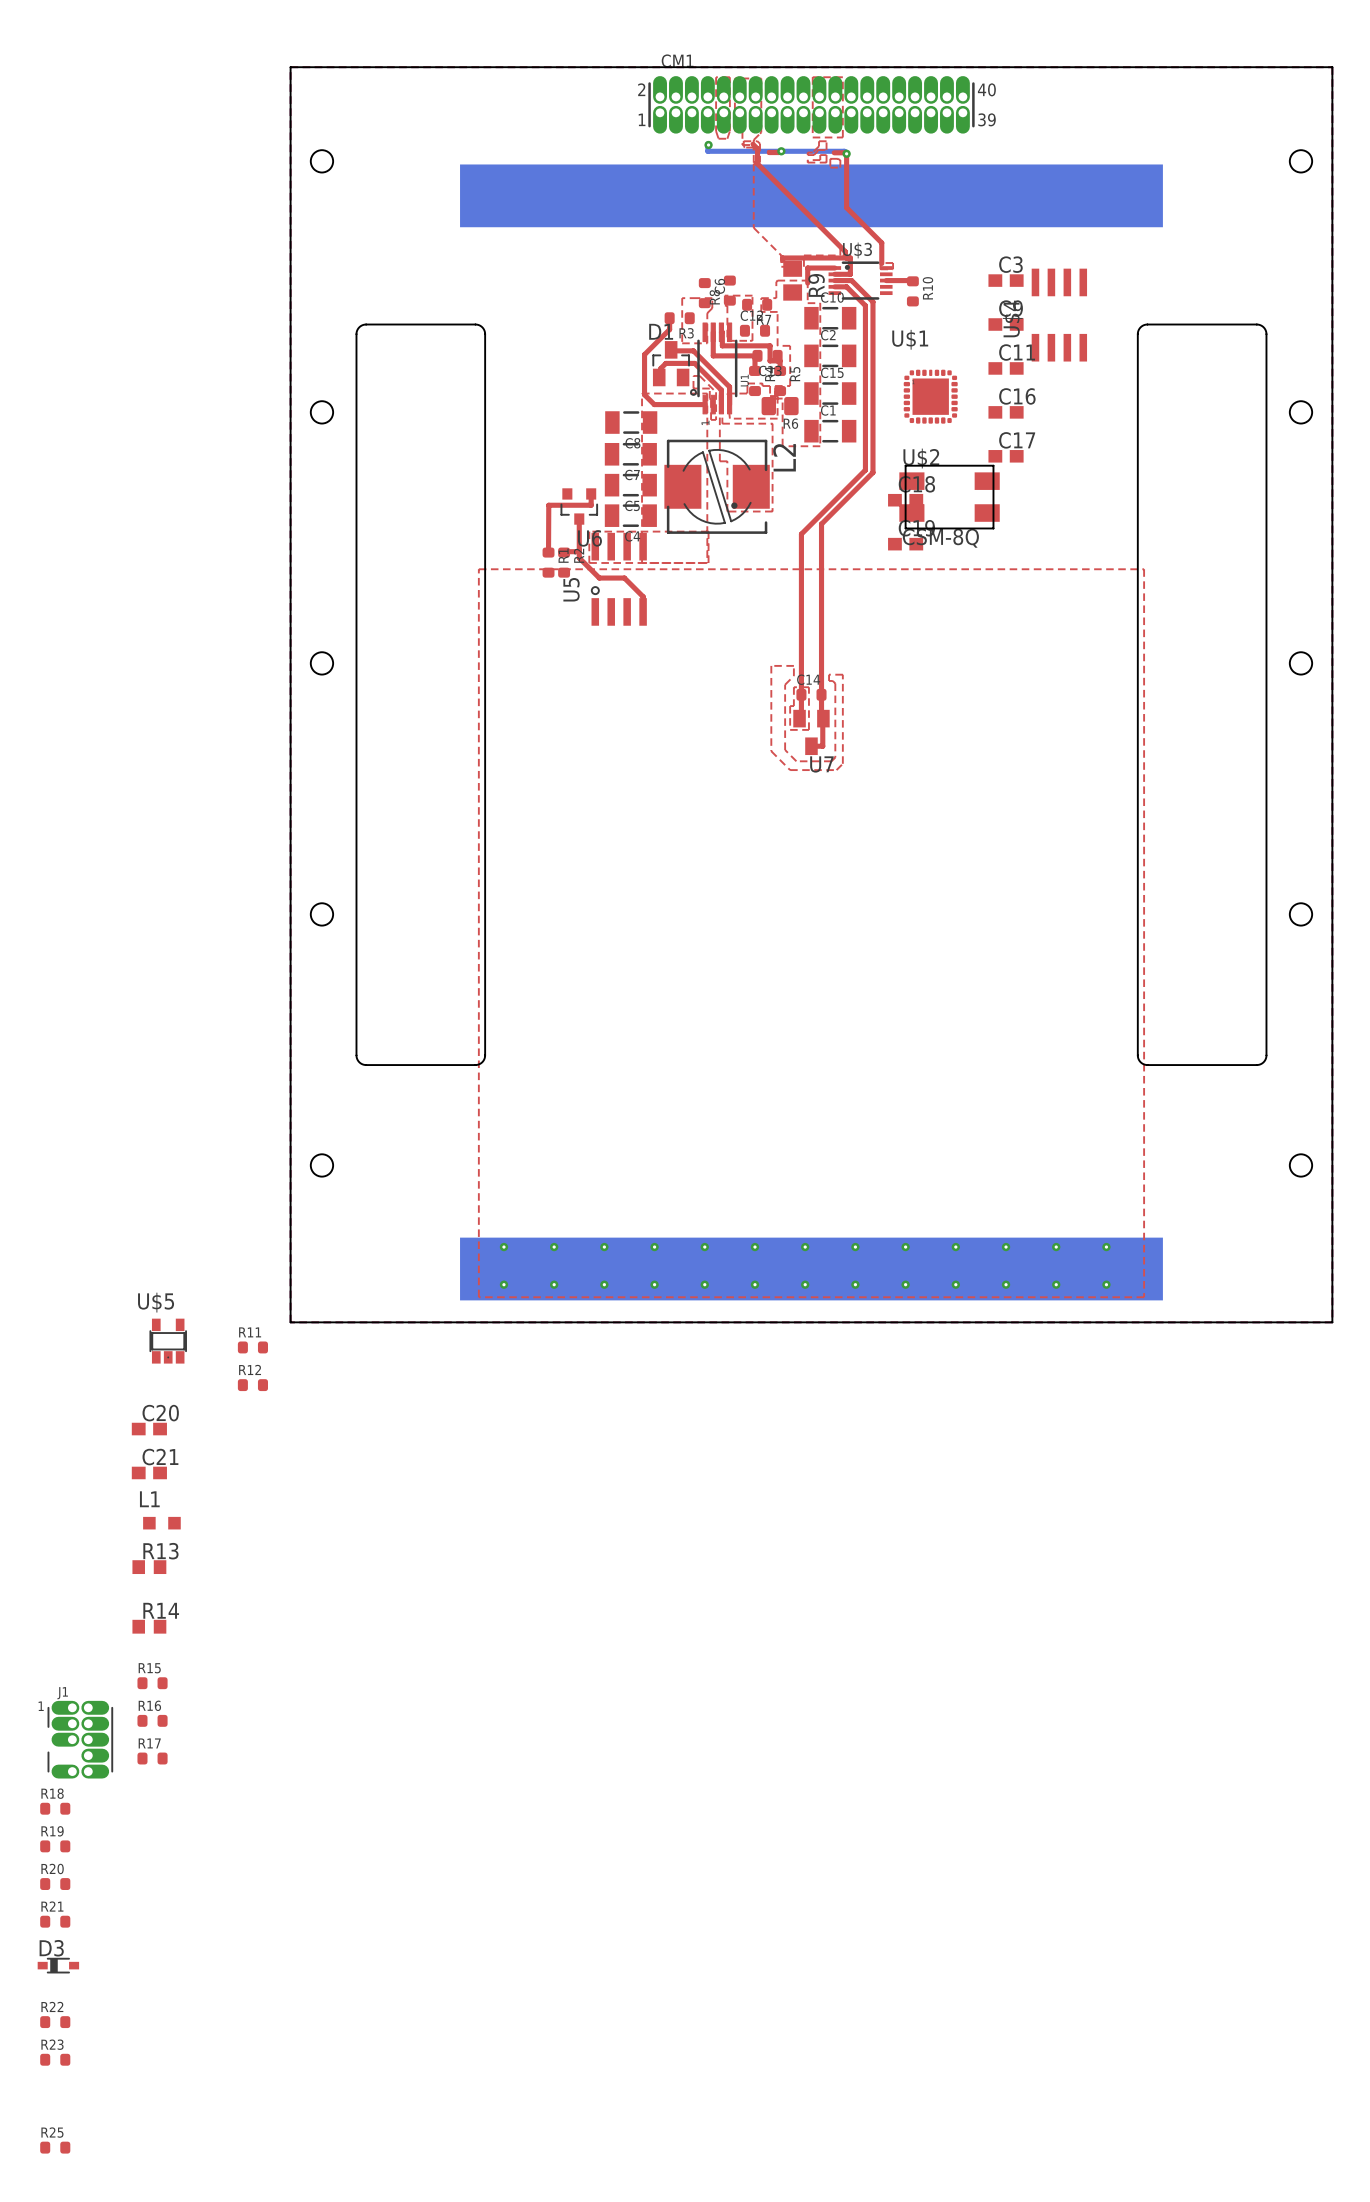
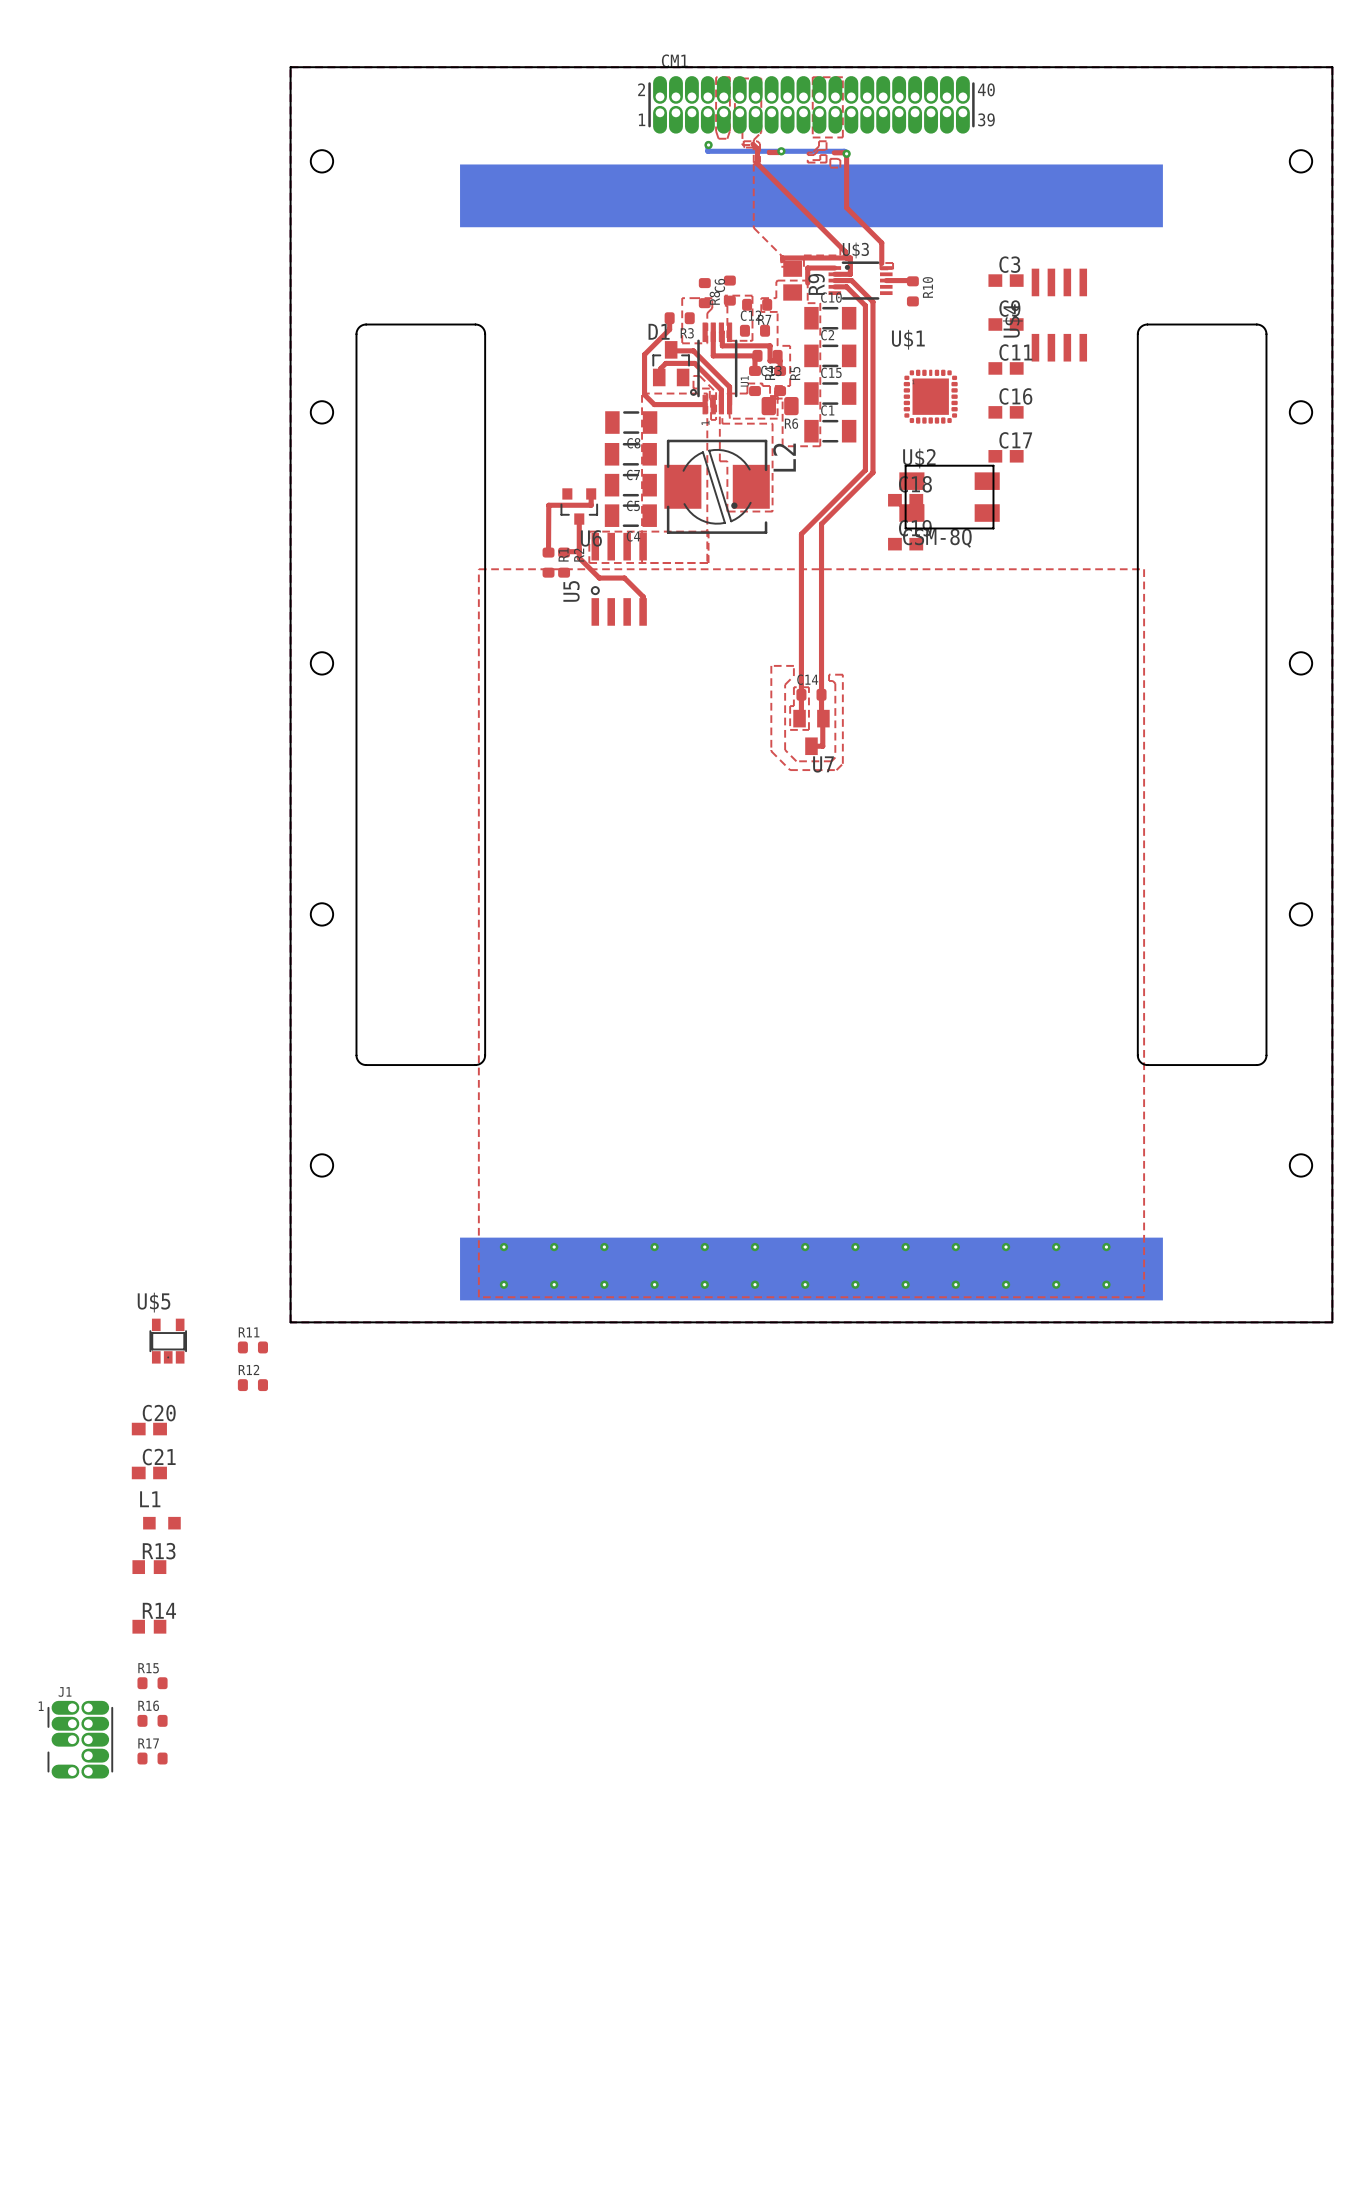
R18: (55, 1808) -> none
R19: (55, 1846) -> none
R20: (55, 1884) -> none
R21: (55, 1921) -> none
D3: (58, 1965) -> none
R22: (55, 2022) -> none
R23: (55, 2059) -> none
R25: (55, 2147) -> none

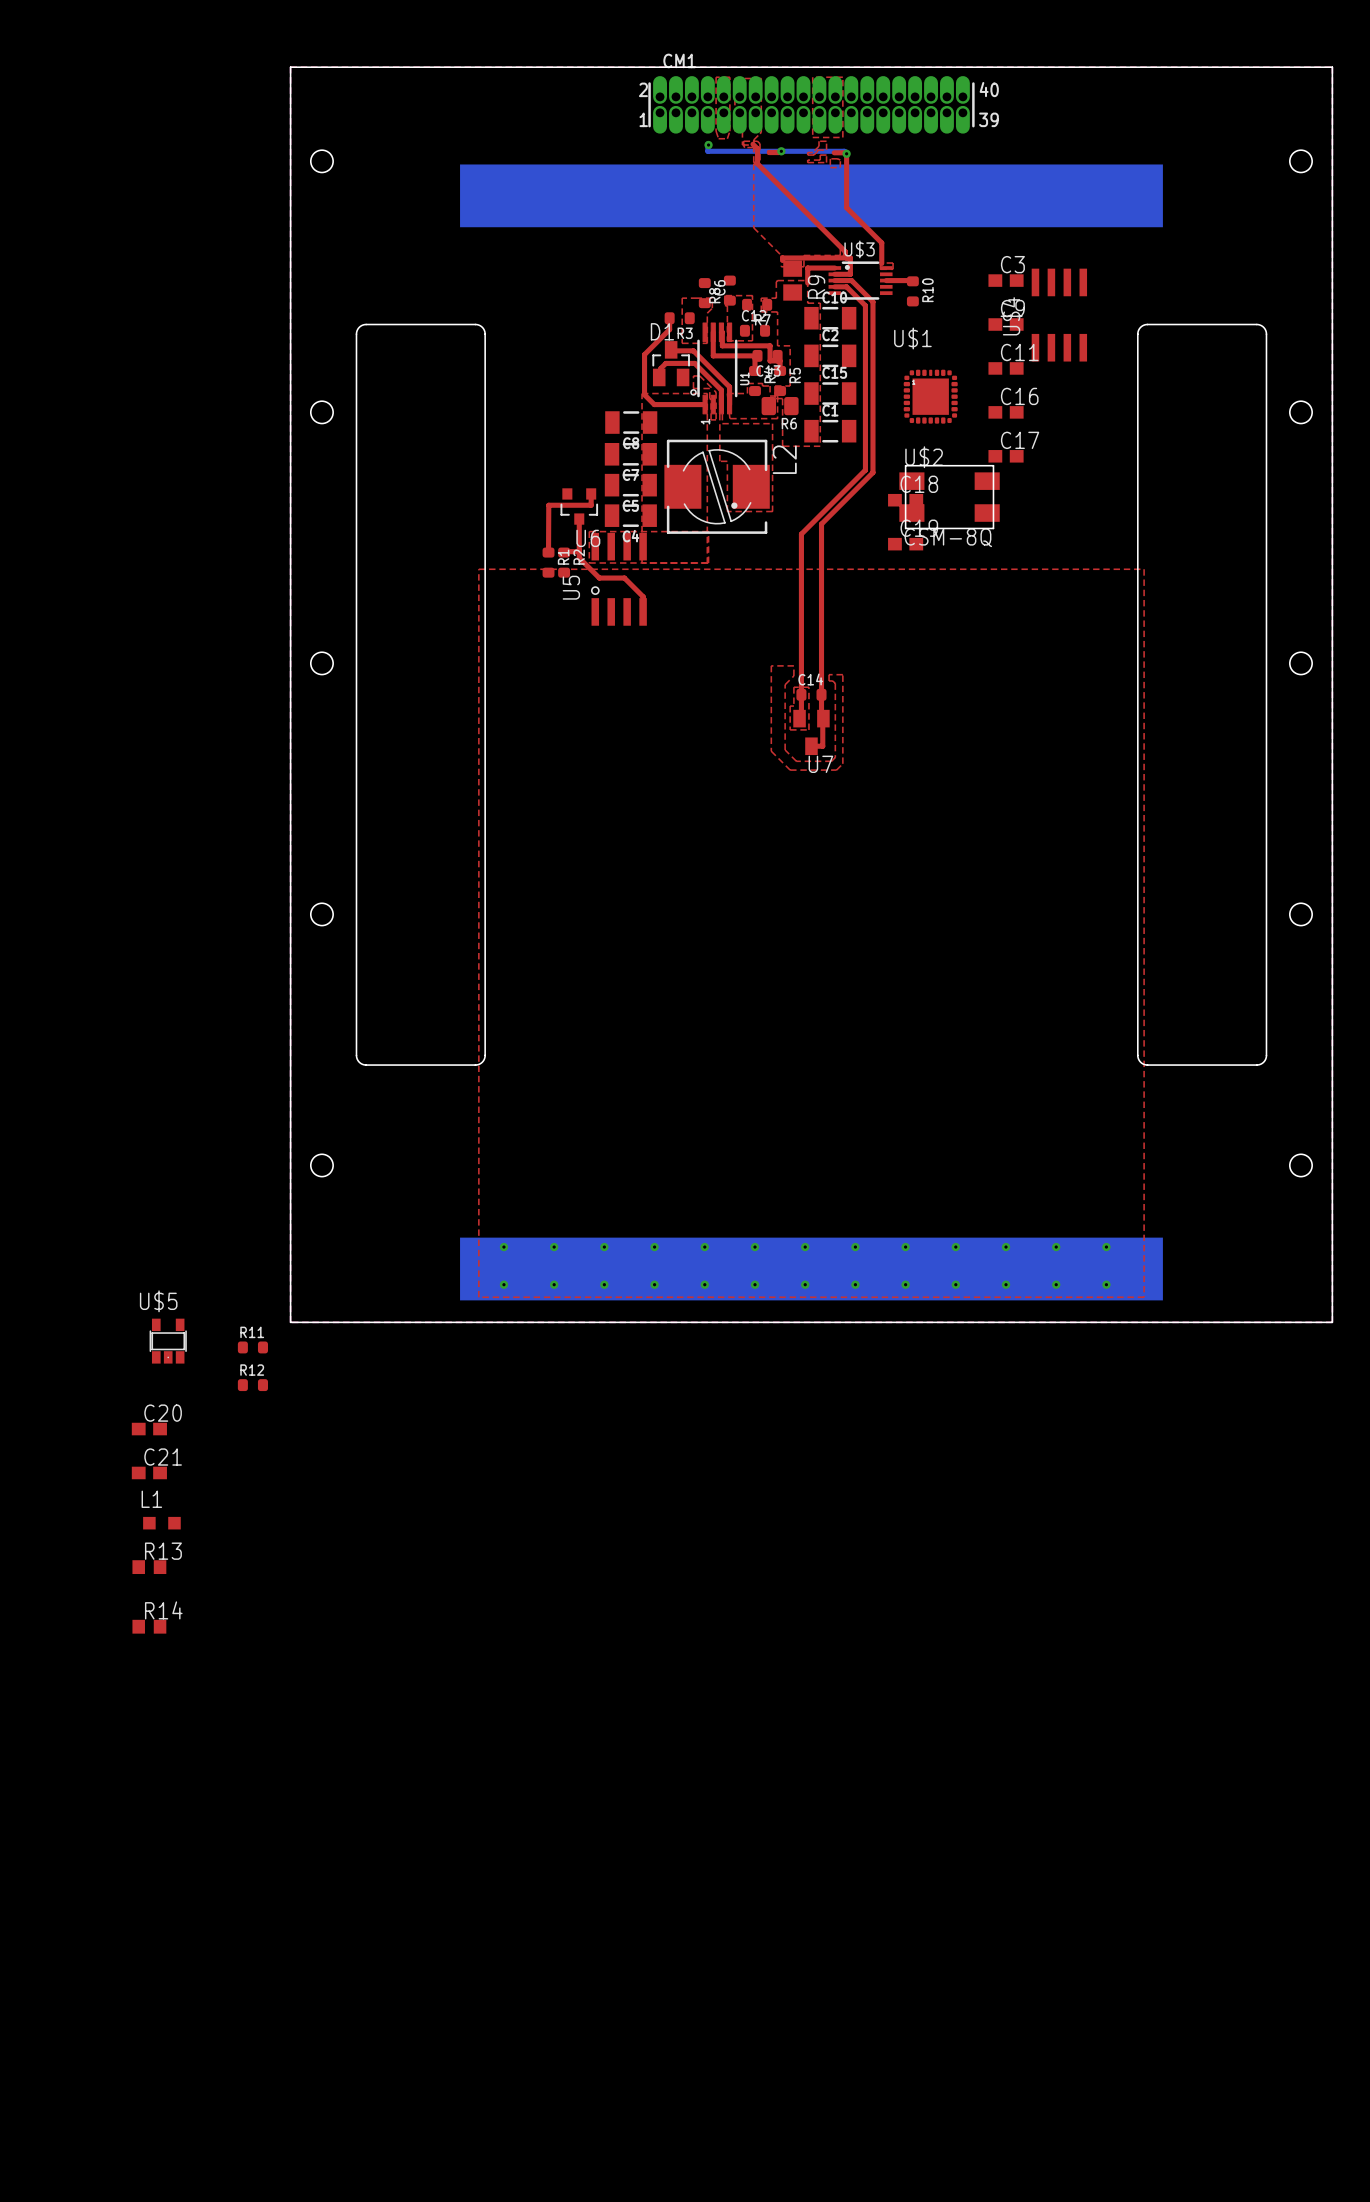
R15: (152, 1683) -> none
R16: (152, 1720) -> none
J1: (80, 1739) -> none
R17: (152, 1758) -> none

